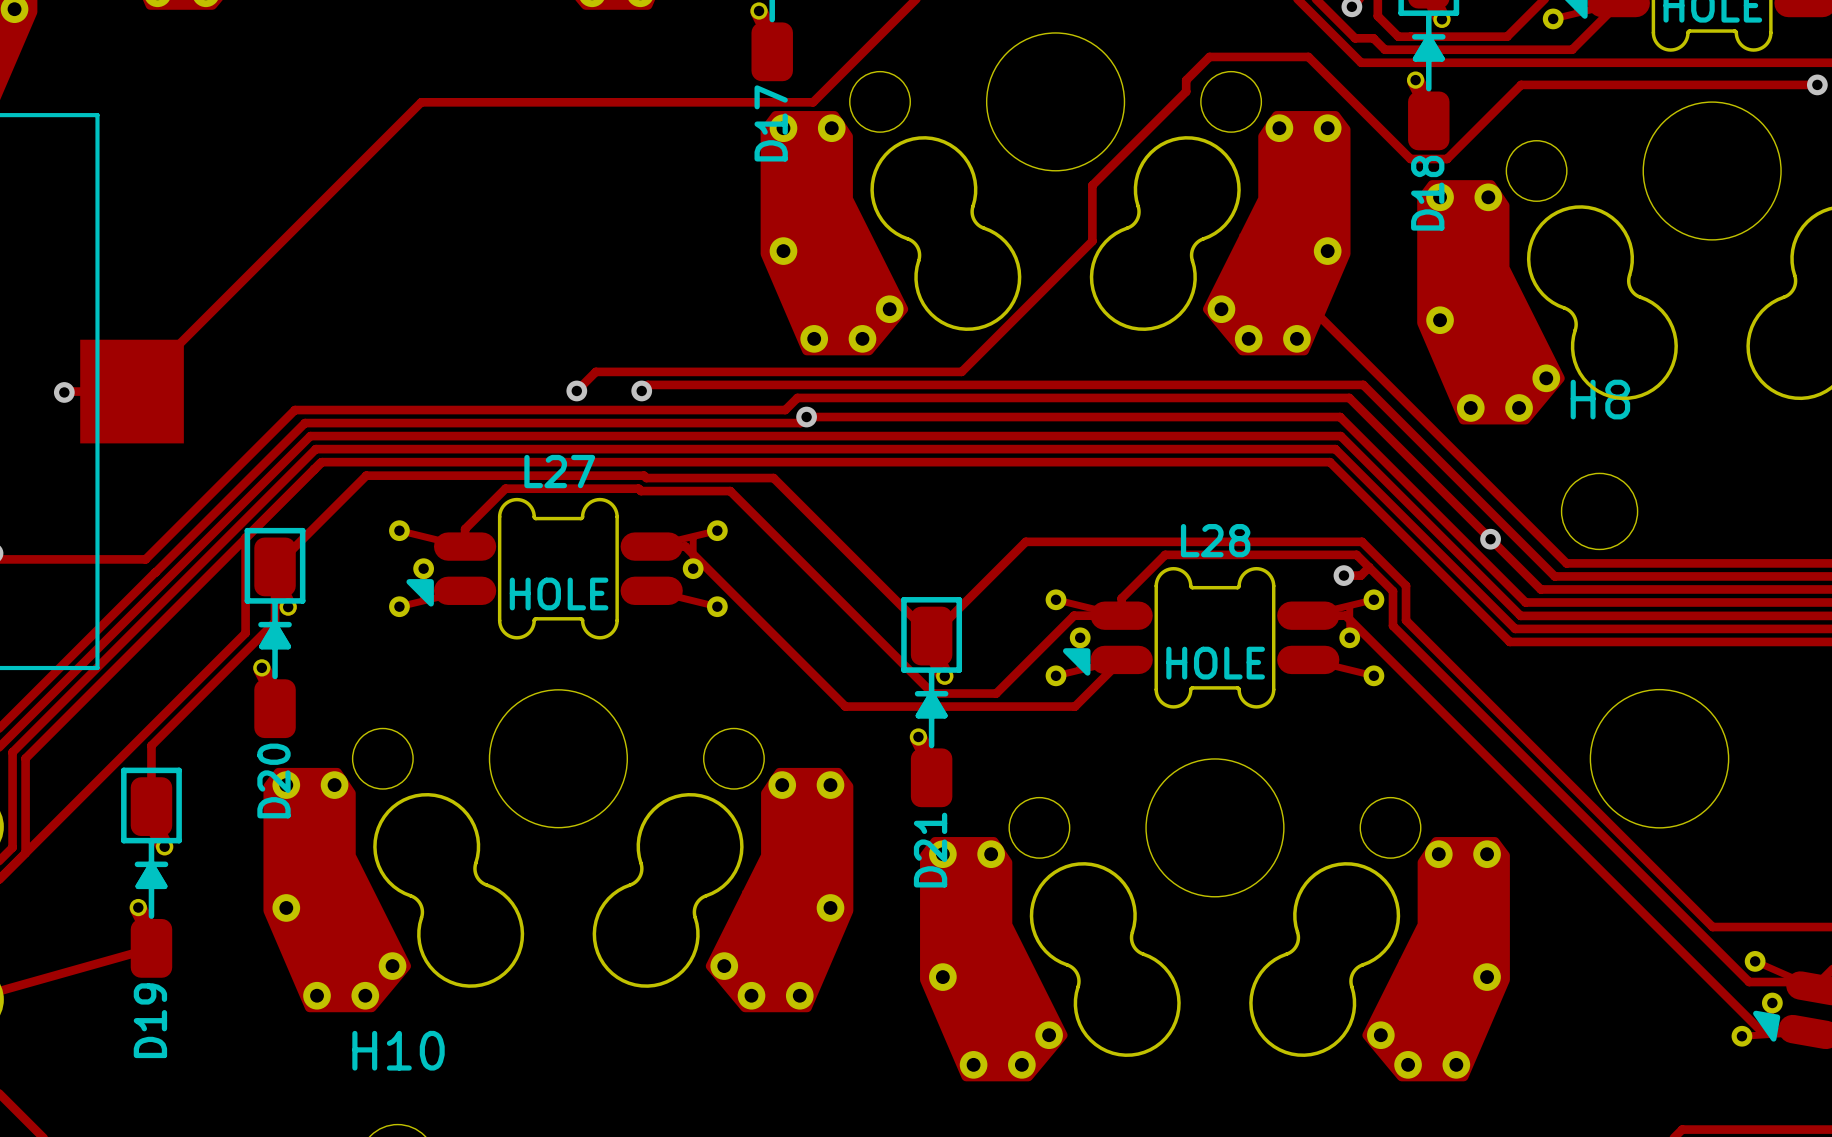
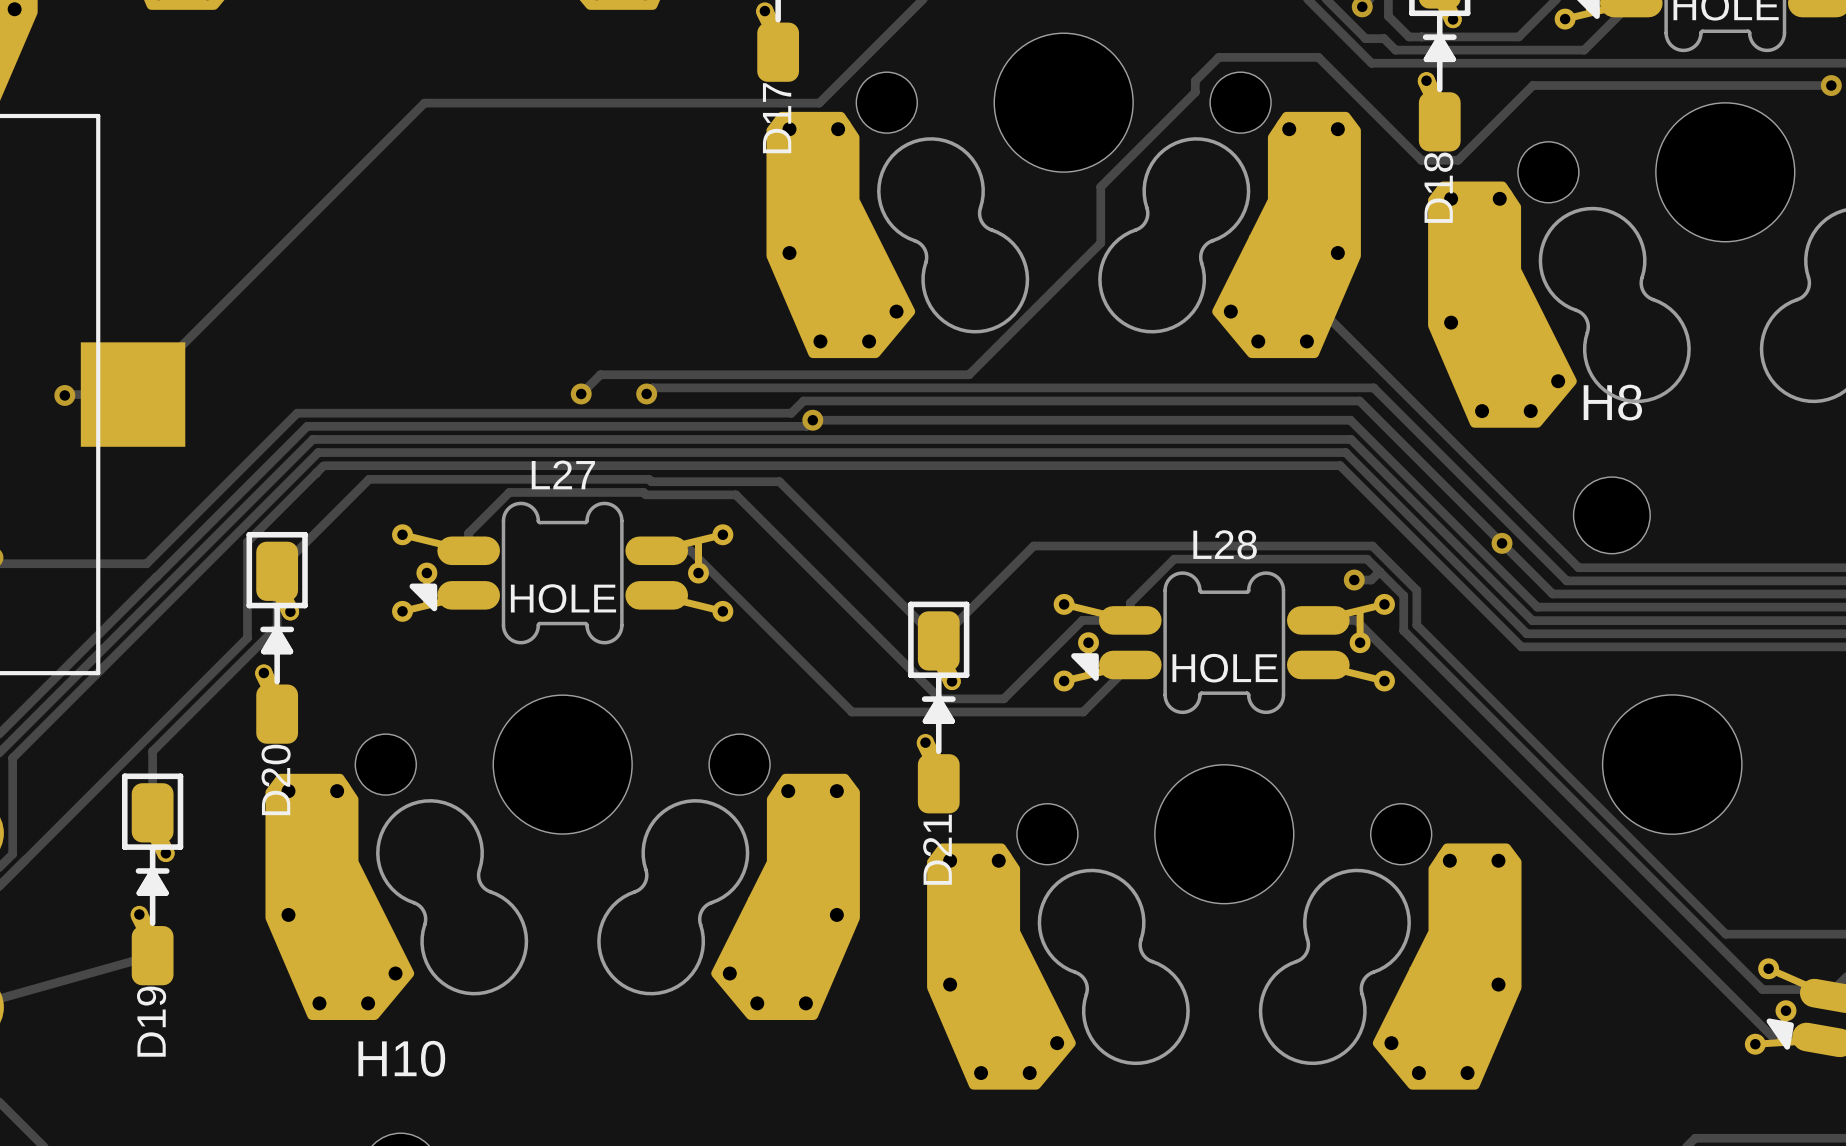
track: (321, 462) (25, 758) (25, 852) -> none

